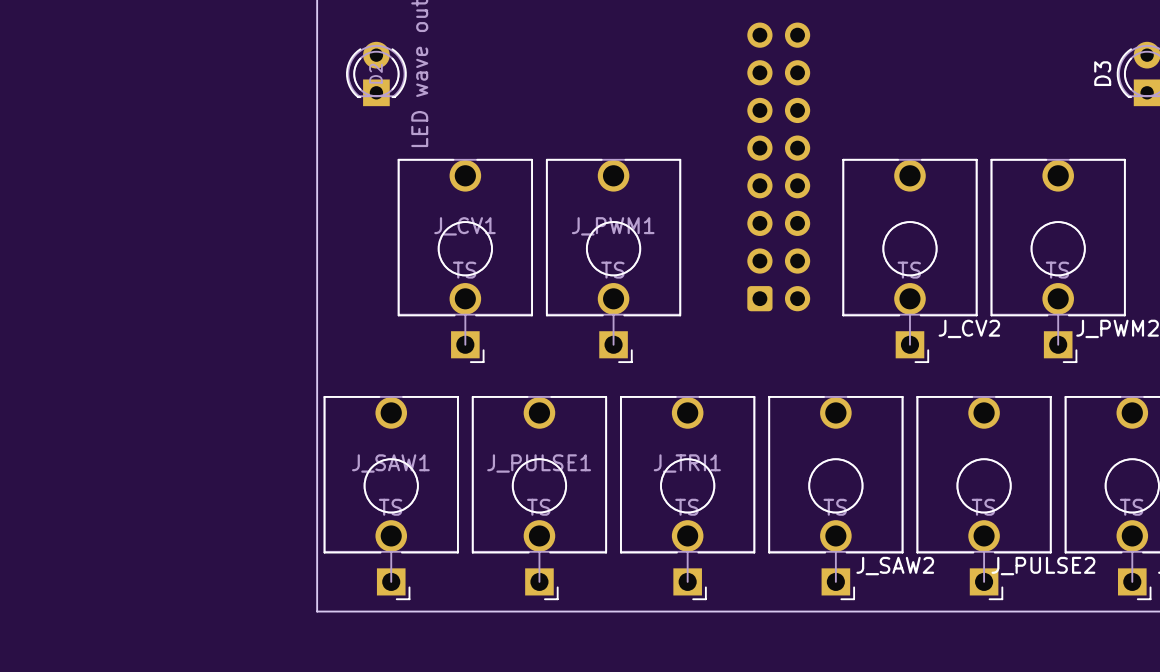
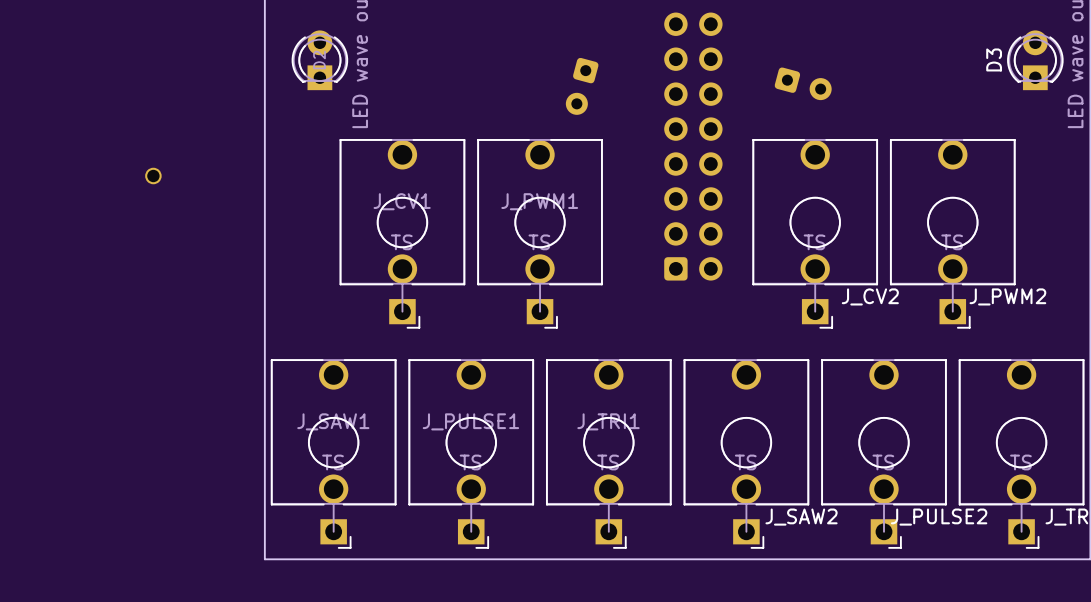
part: none -> (803, 83)
part: none -> (582, 86)
part: none -> (153, 176)

